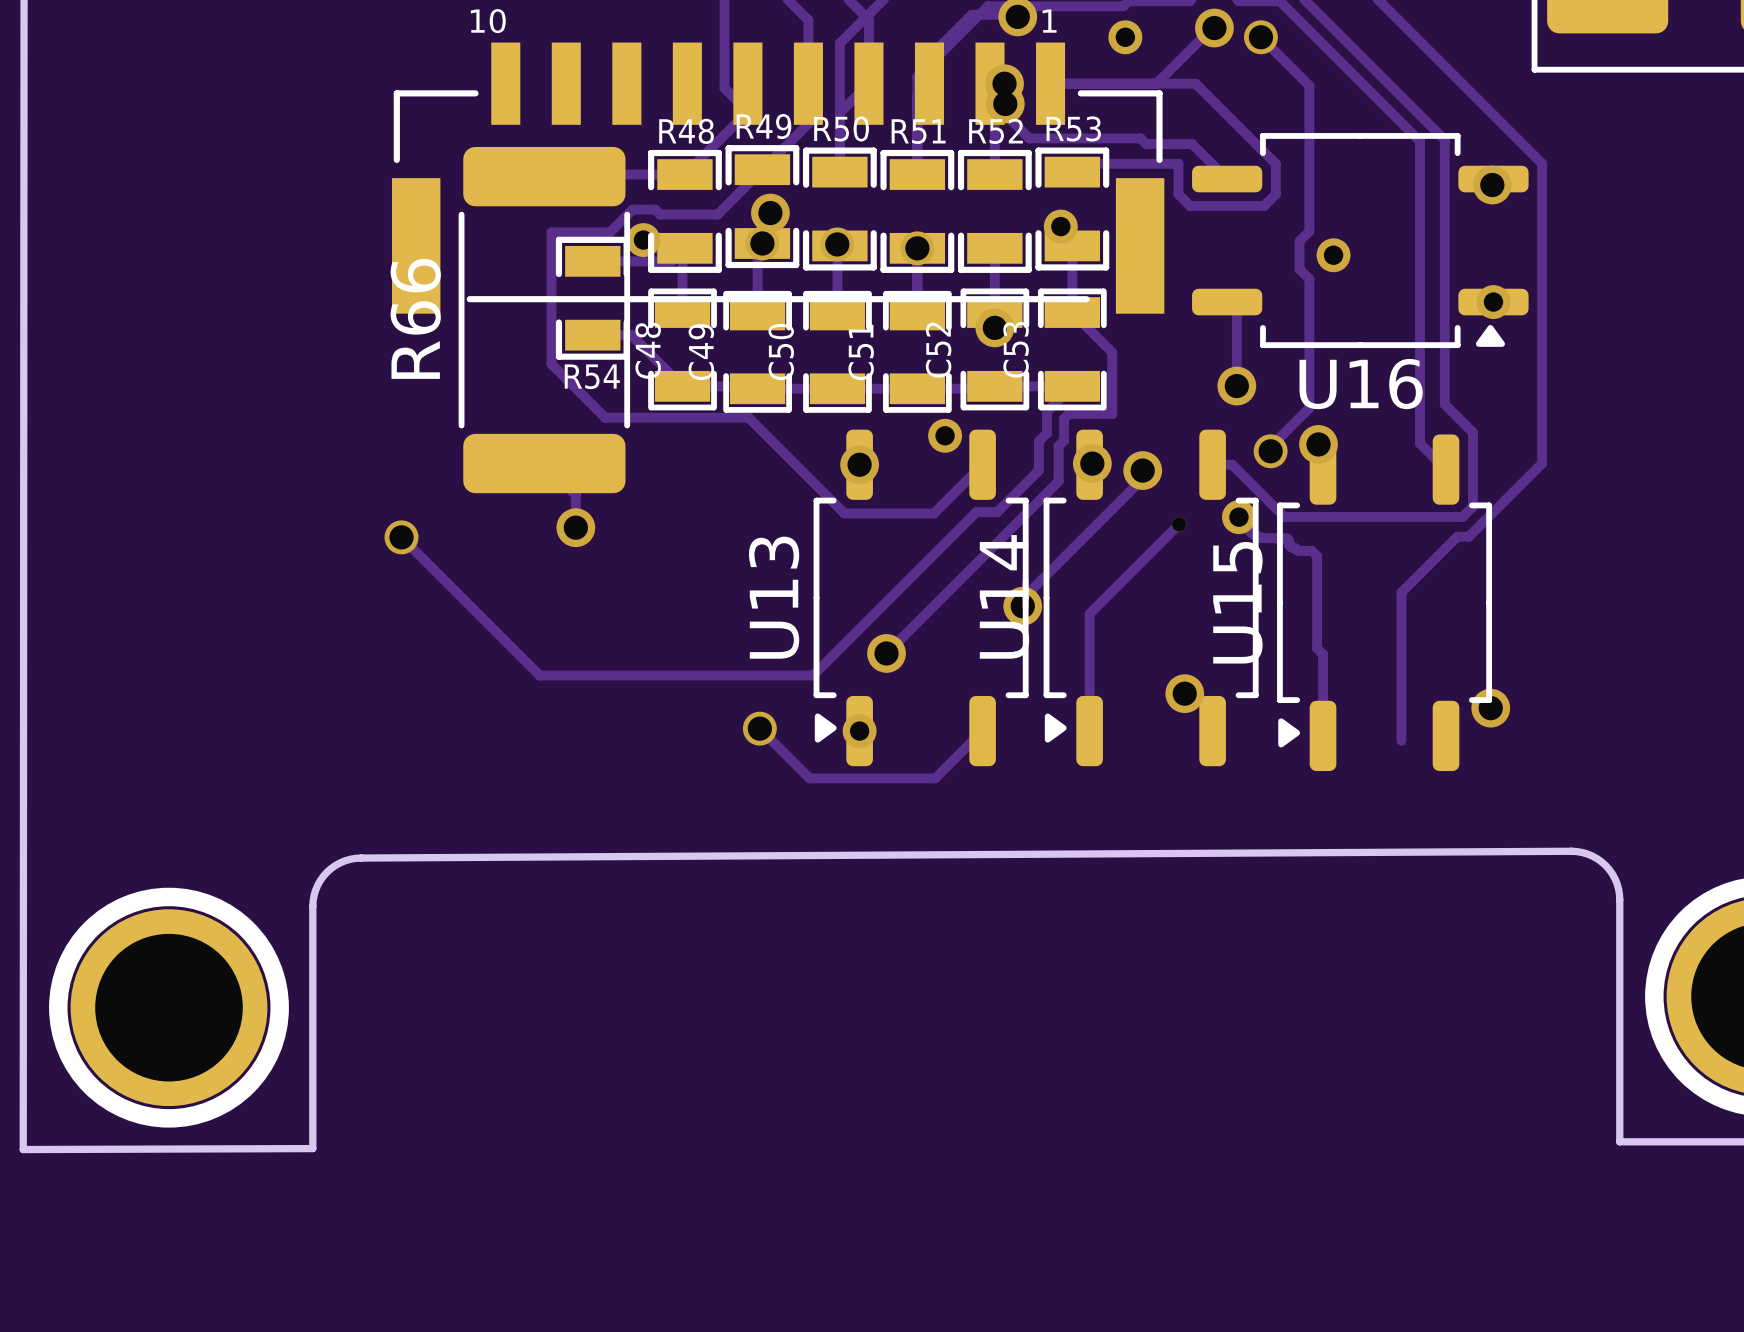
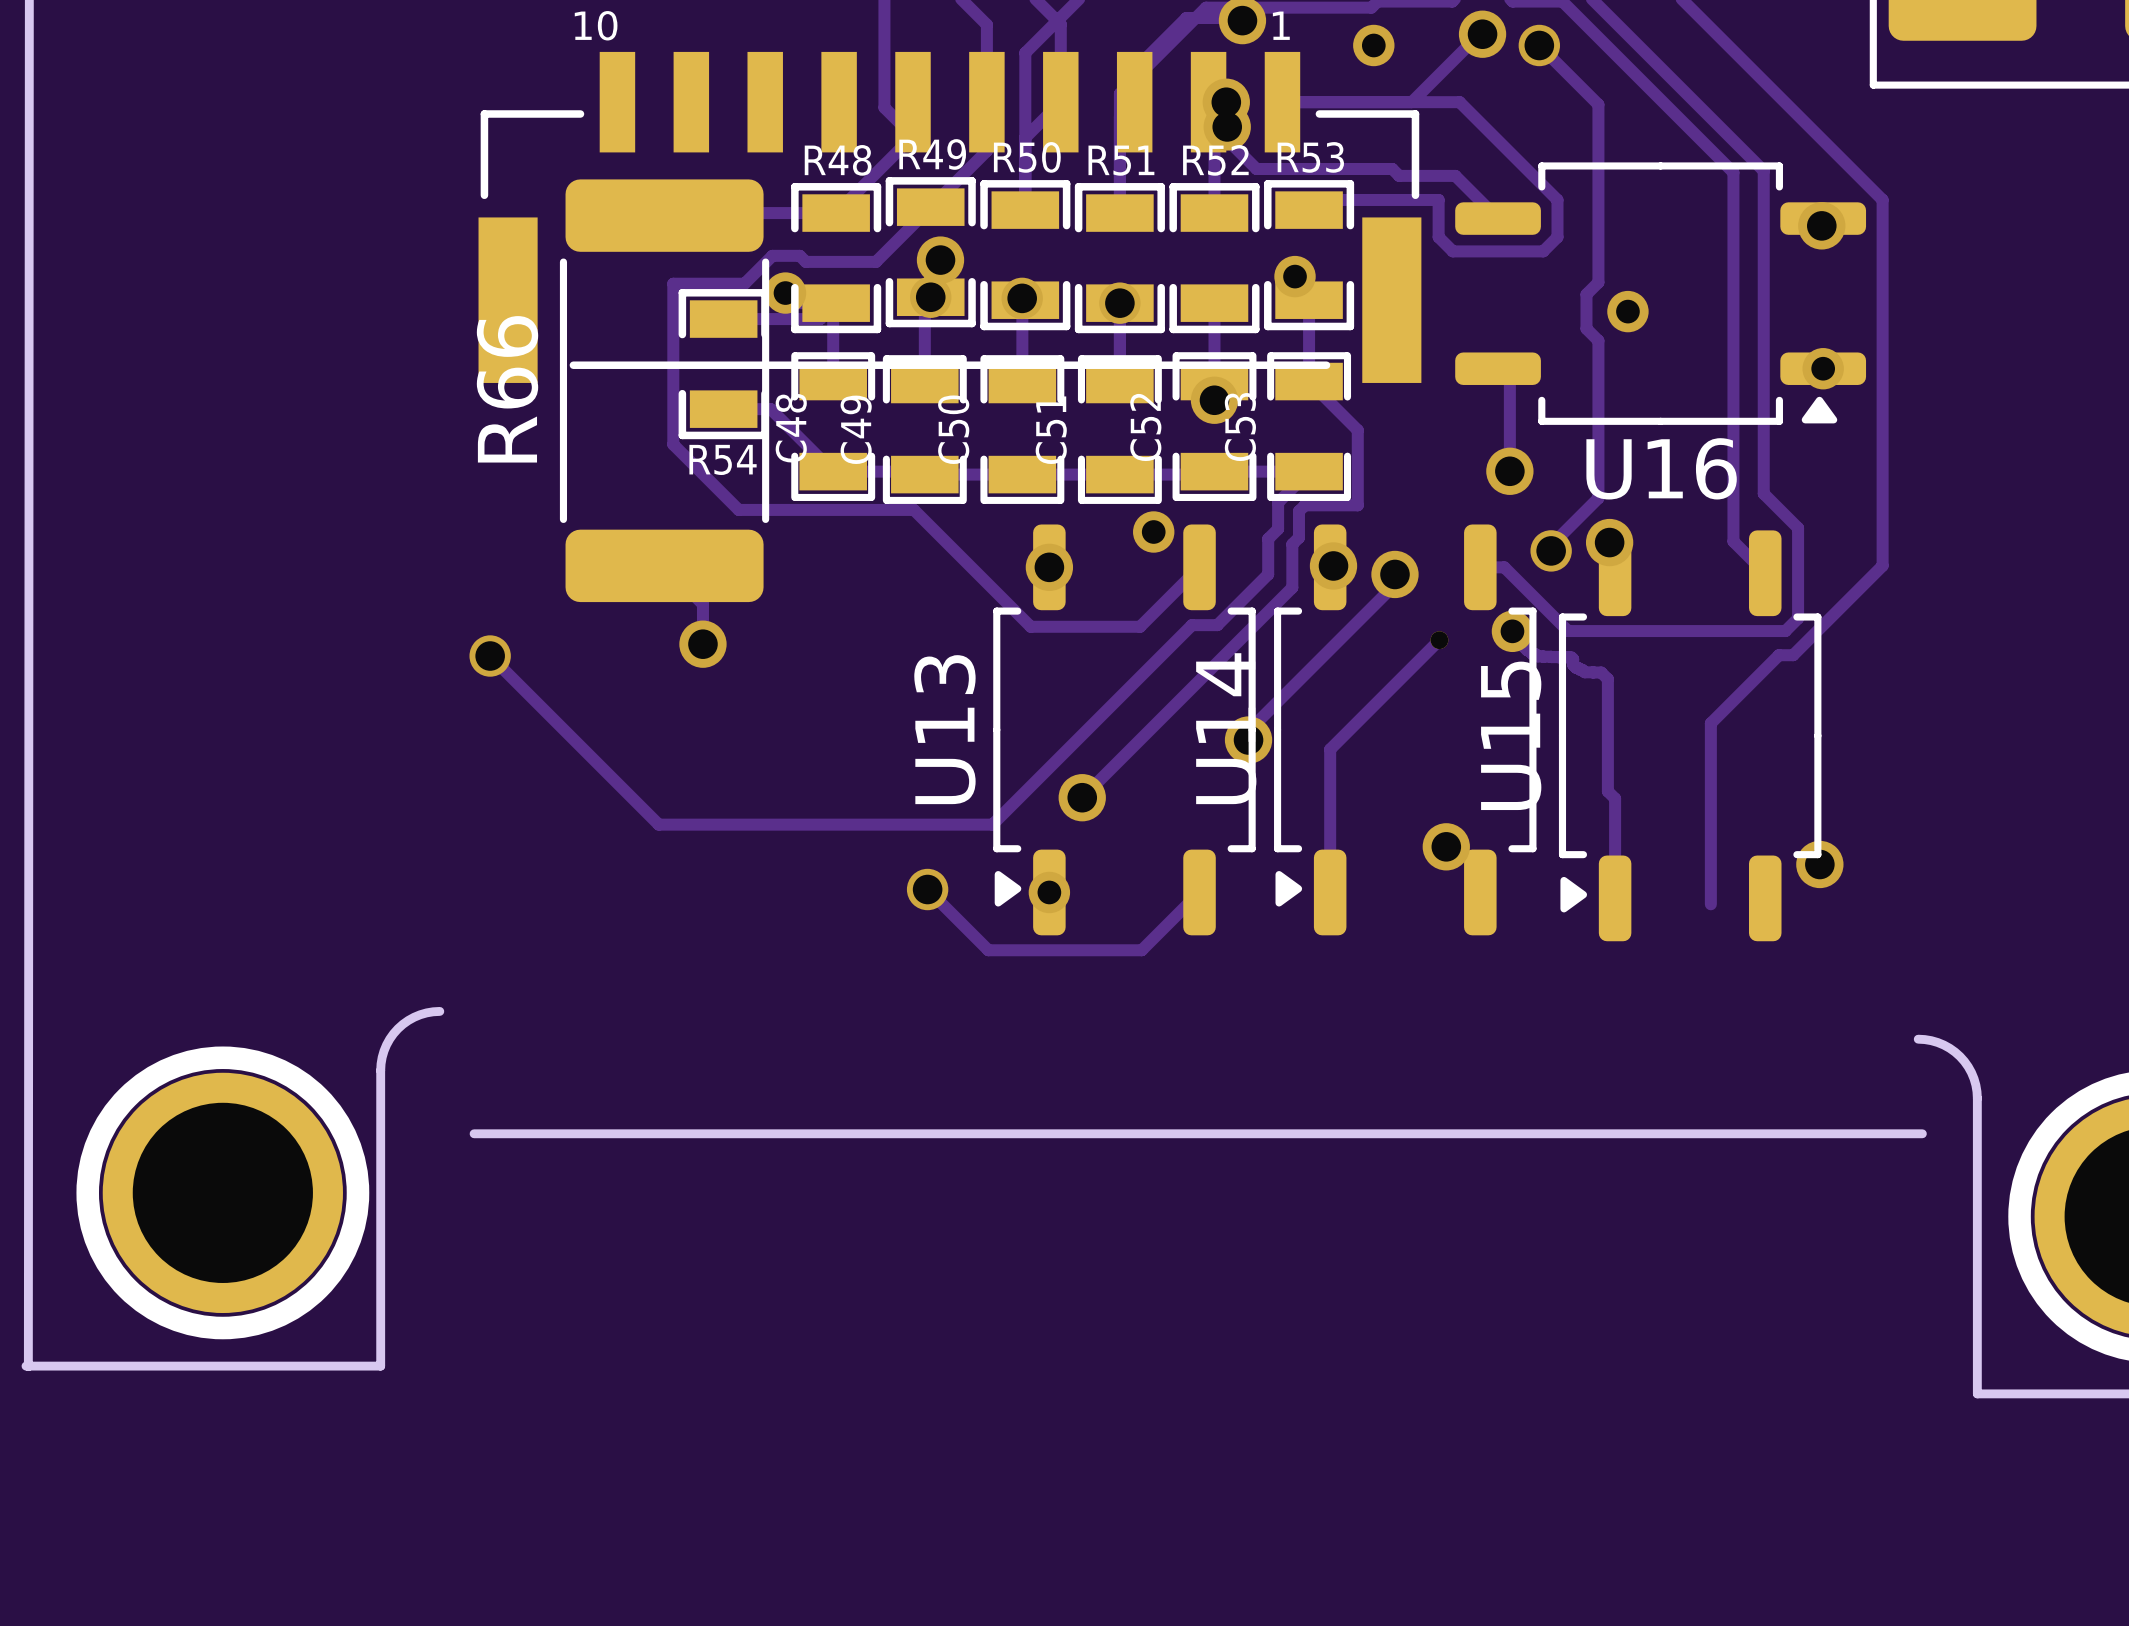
board edge: none -> (439, 1011) (414, 1017) (398, 1028) (386, 1044) (381, 1063) (380, 1366) (26, 1366)
board edge: (1571, 851) (350, 859) (335, 865) (323, 876) (317, 885) (313, 901) (312, 1148) (23, 1149) (23, 1119) -> none
board edge: none -> (474, 1133) (1922, 1133)
part position: (168, 1007) -> (222, 1192)

